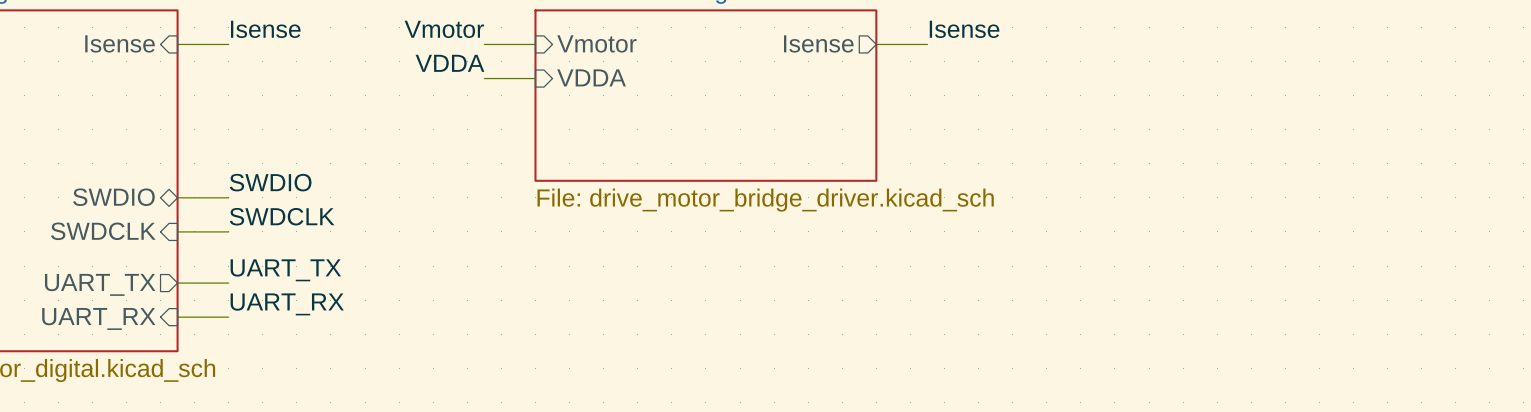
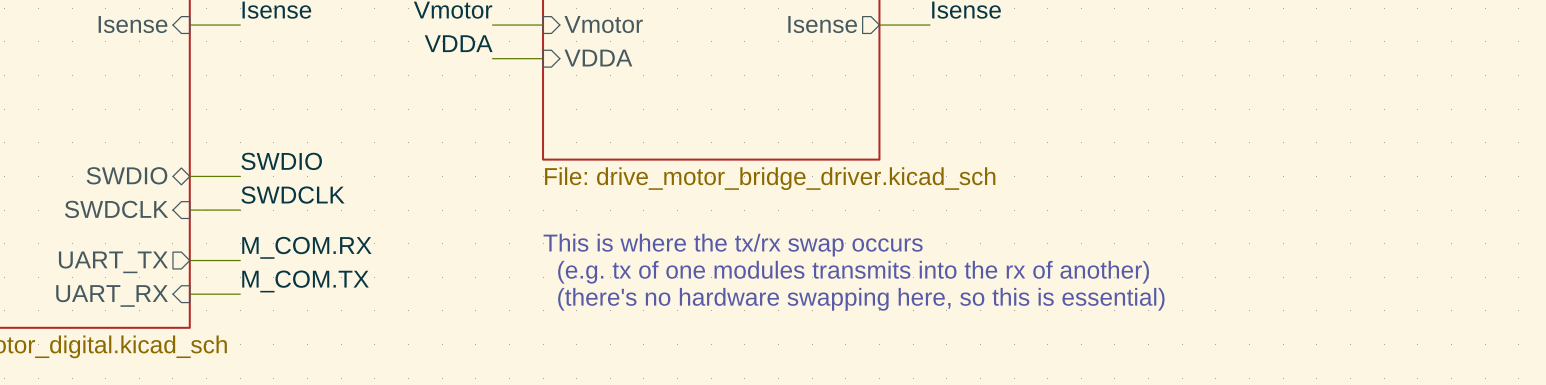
text: none -> This is where the tx/rx swap occurs (733, 245)
label: UART_TX (285, 270) -> M_COM.RX (306, 247)
text: none -> (e.g. tx of one modules transmits into the rx of another) (853, 272)
label: UART_RX (287, 304) -> M_COM.TX (305, 281)
text: none -> (there's no hardware swapping here, so this is essential) (861, 299)

